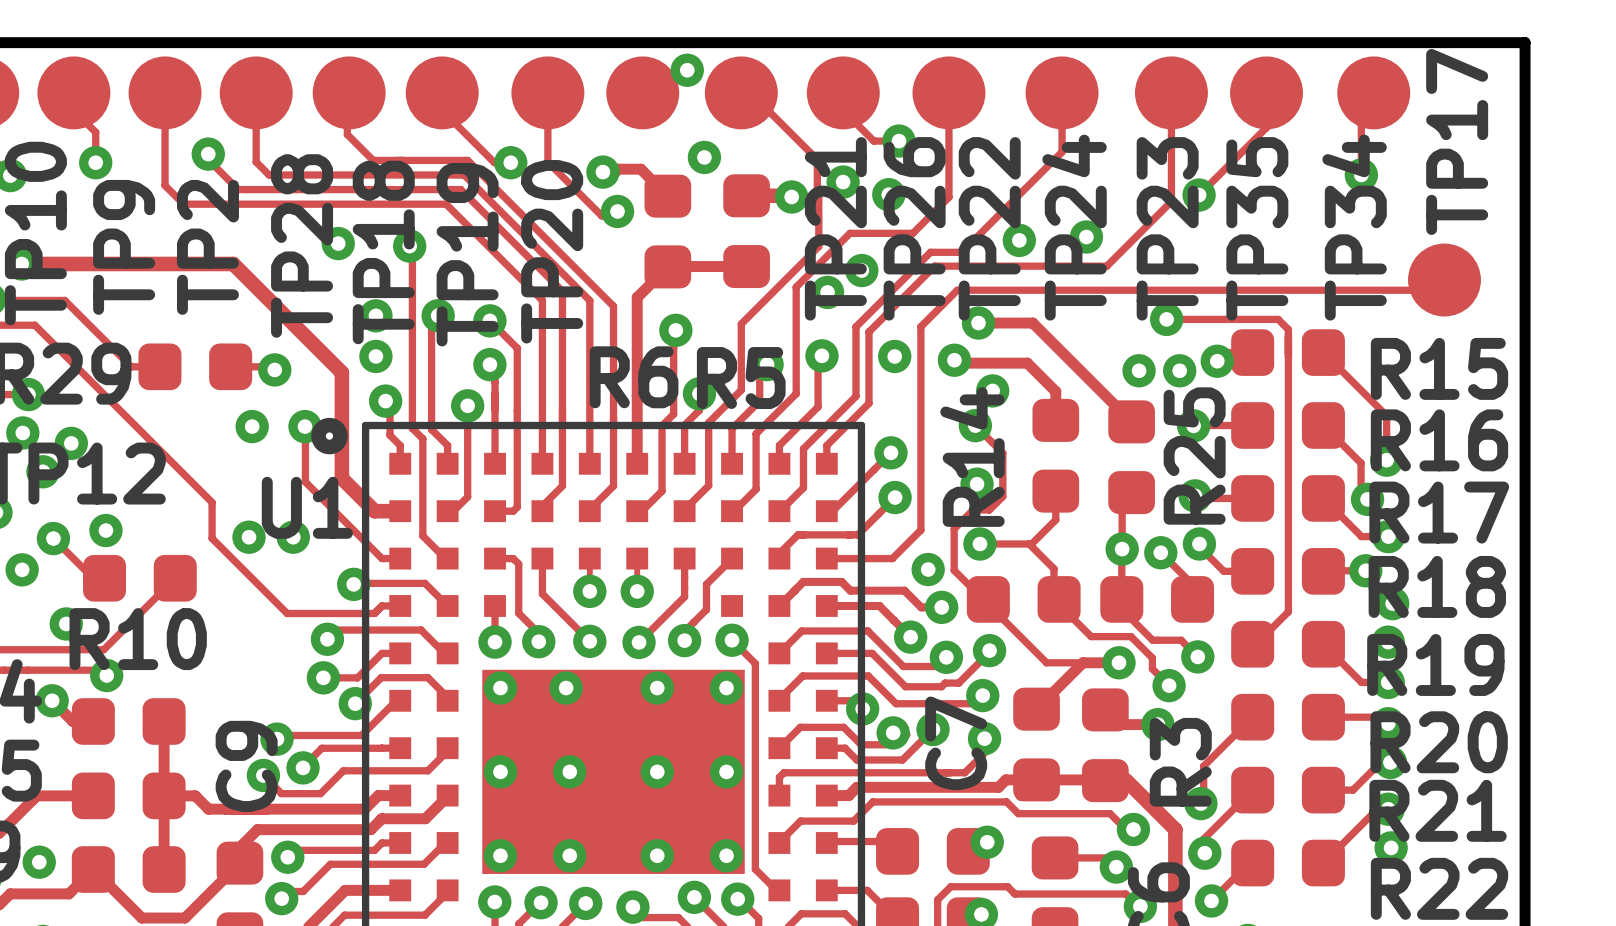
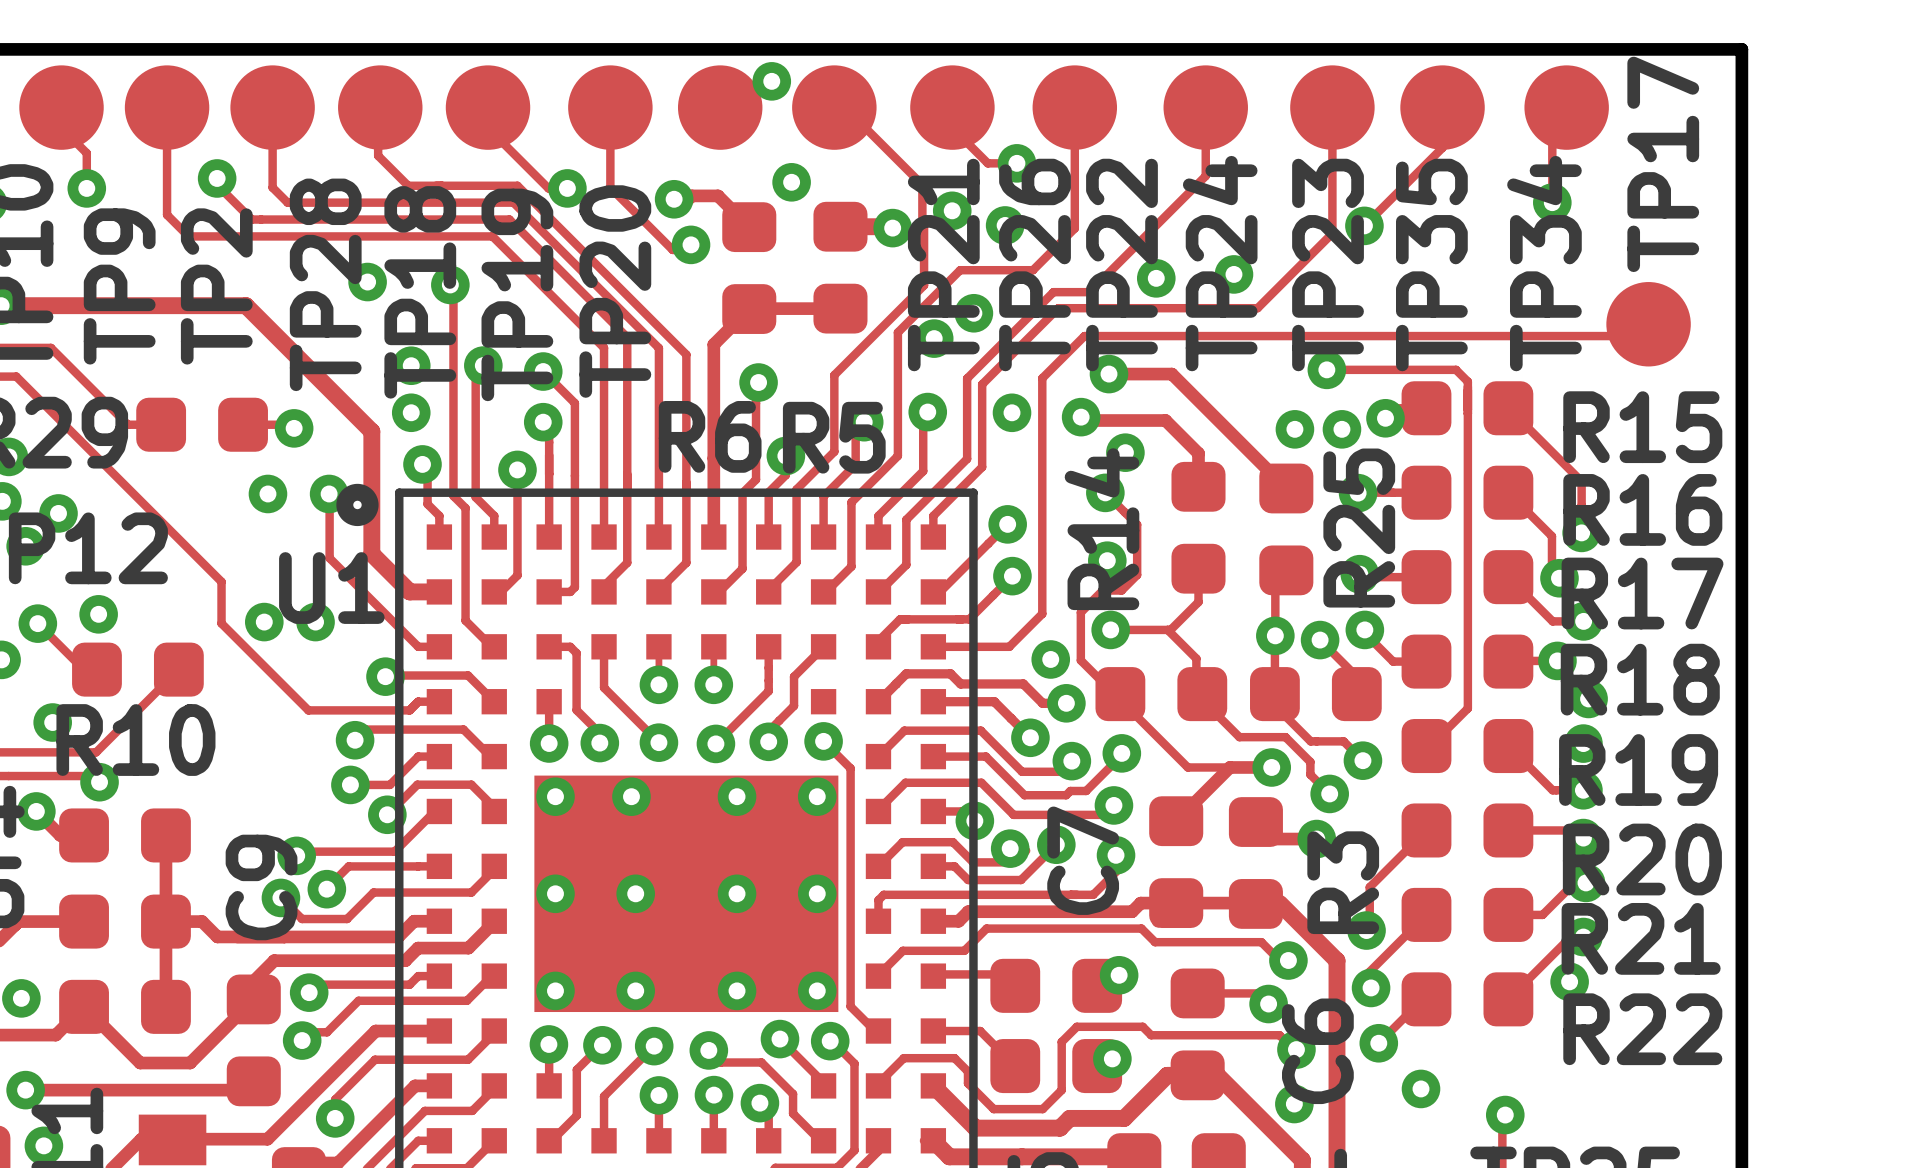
via position: (1391, 847) -> (1569, 981)

